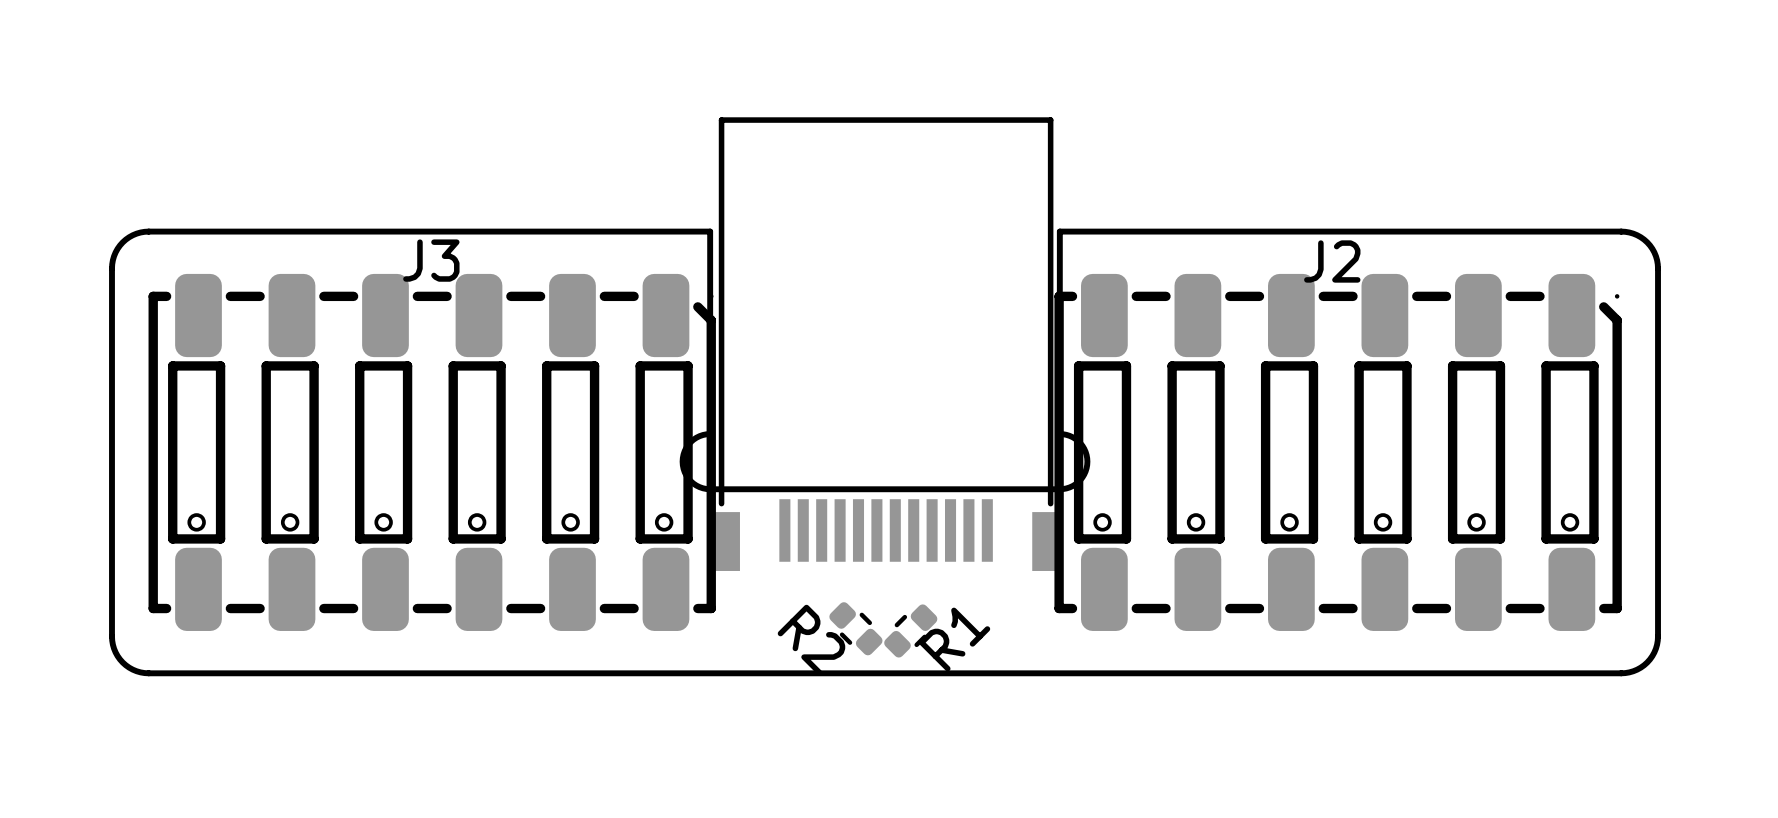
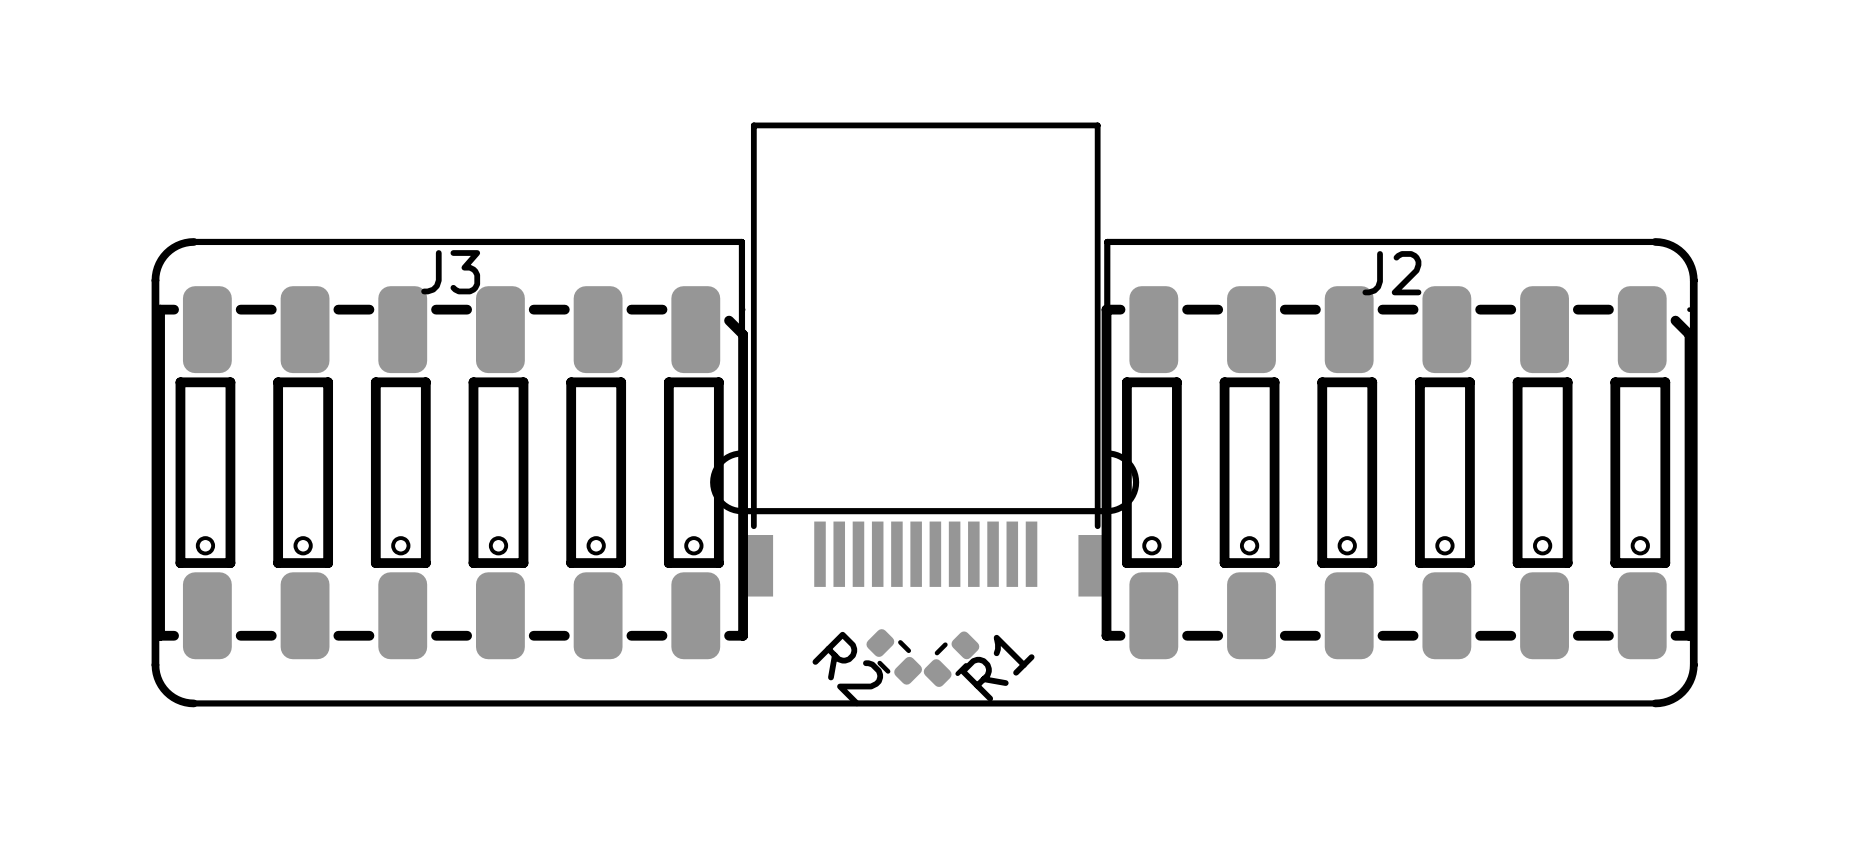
board edge: (185, 231) (144, 231) (132, 235) (117, 248) (111, 268) (112, 644) (120, 659) (136, 671) (148, 673) (185, 673) -> (193, 241) (177, 245) (166, 253) (159, 263) (155, 280) (155, 669) (159, 681) (169, 695) (181, 701) (193, 703)
board edge: (1584, 231) (1625, 231) (1637, 235) (1652, 248) (1658, 268) (1657, 644) (1649, 659) (1633, 671) (1621, 673) (1584, 673) -> (1655, 241) (1671, 245) (1682, 253) (1691, 267) (1693, 280) (1693, 669) (1689, 681) (1682, 692) (1671, 699) (1655, 703)

